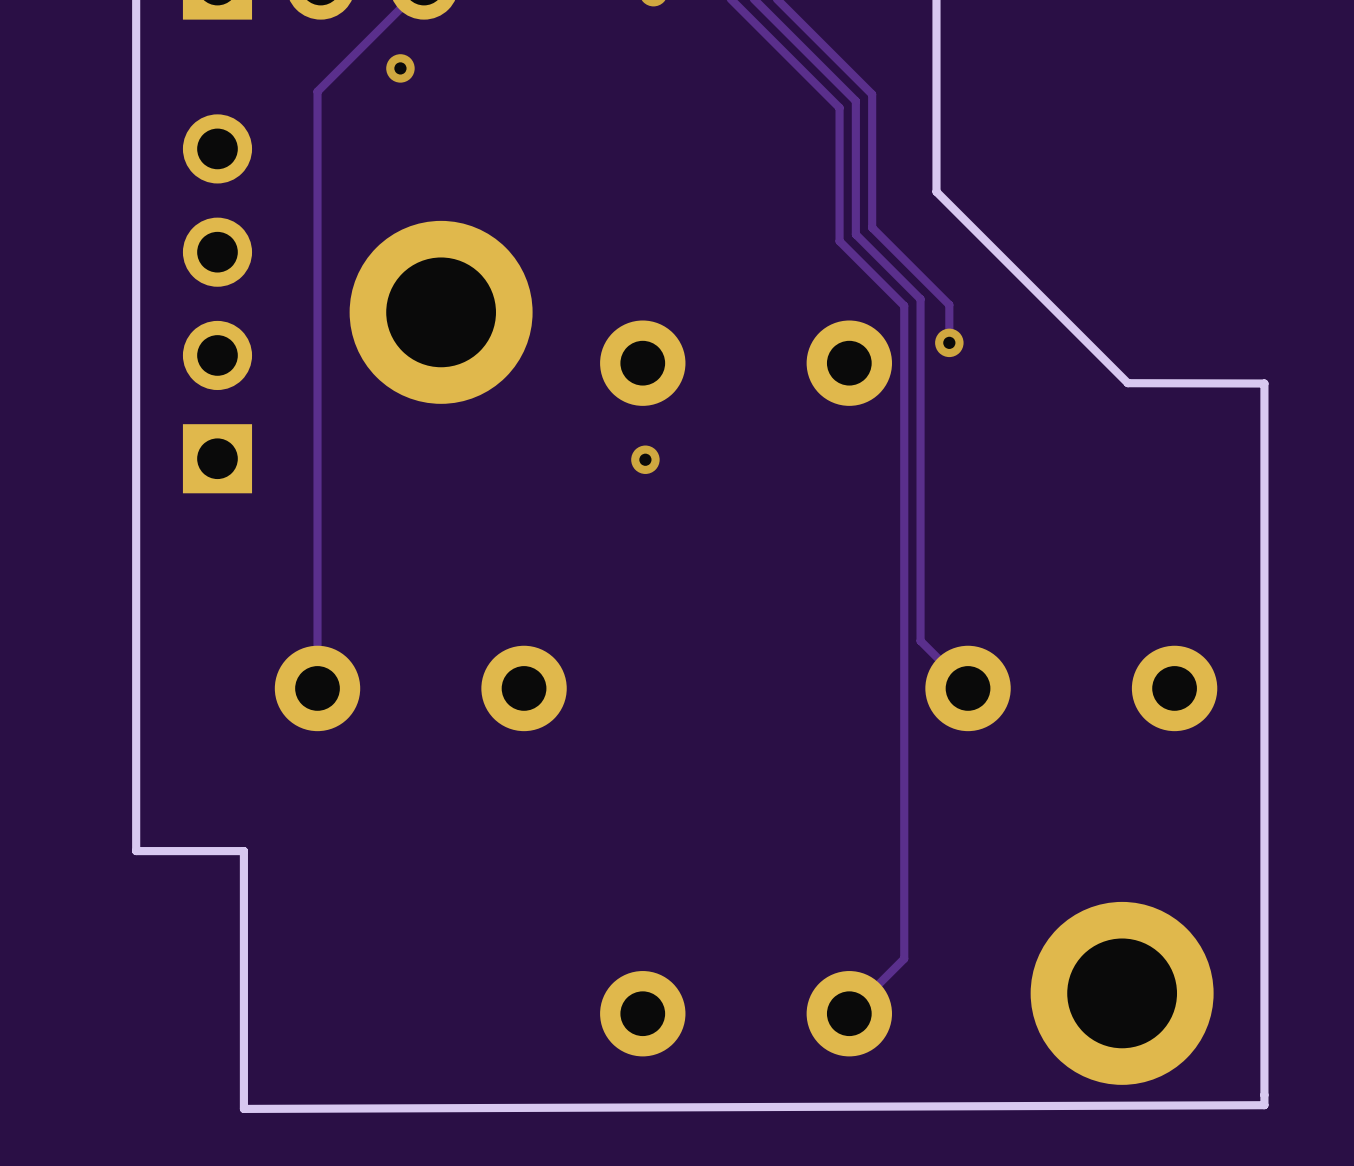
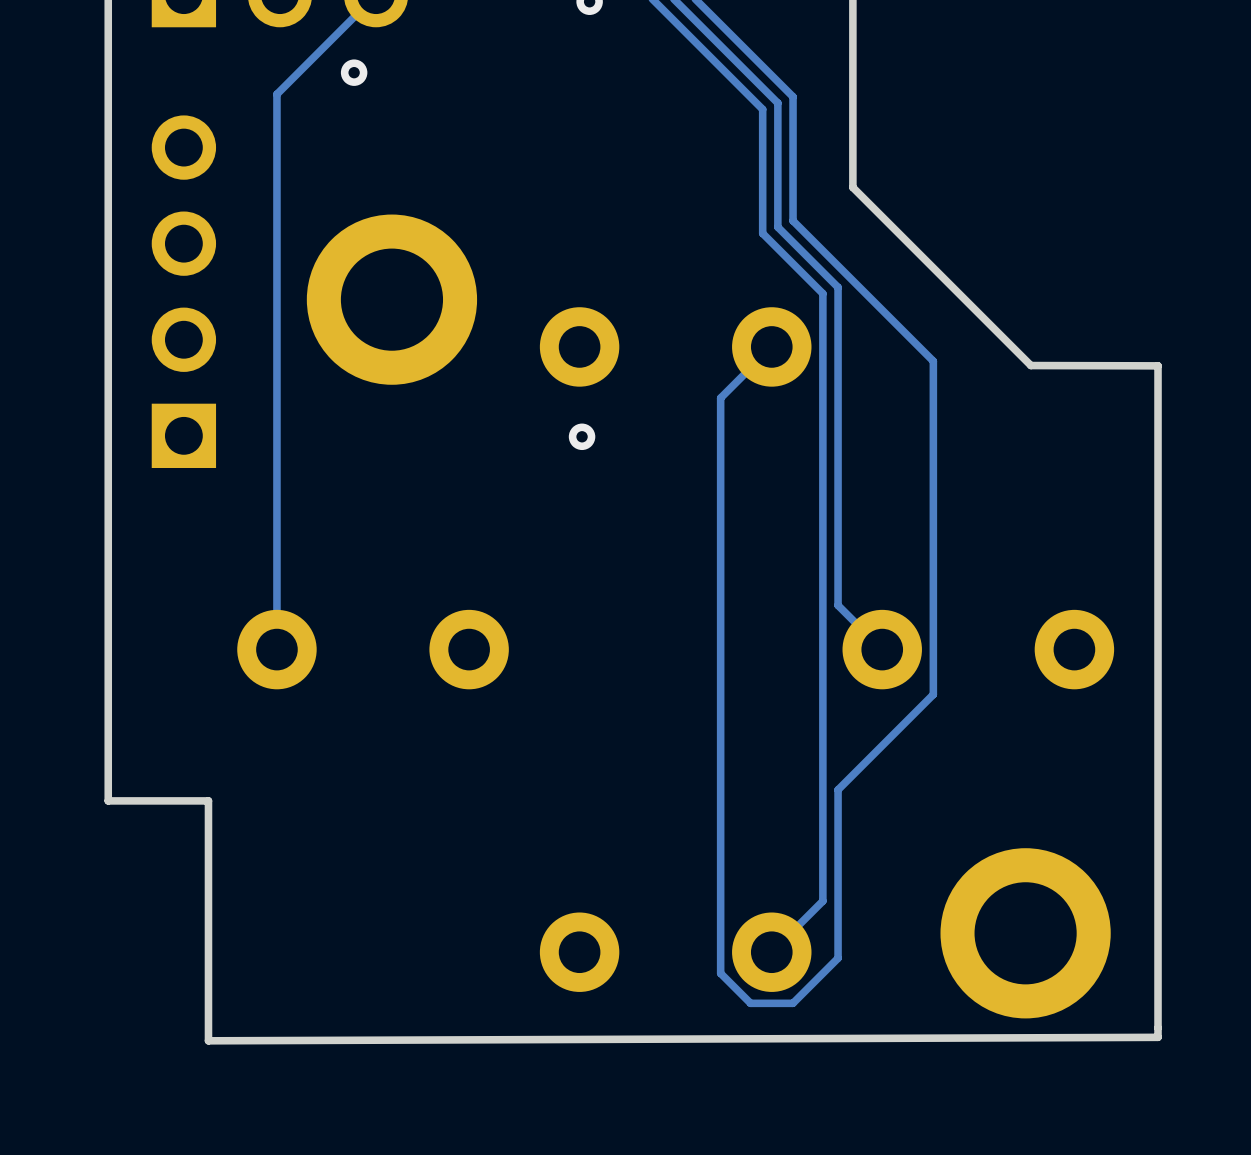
track: (949, 304) (949, 342) -> (864, 292) (933, 361) (933, 694) (838, 789) (838, 958) (792, 1003) (750, 1003) (720, 973) (720, 398) (771, 346)
via: (949, 342) -> none

